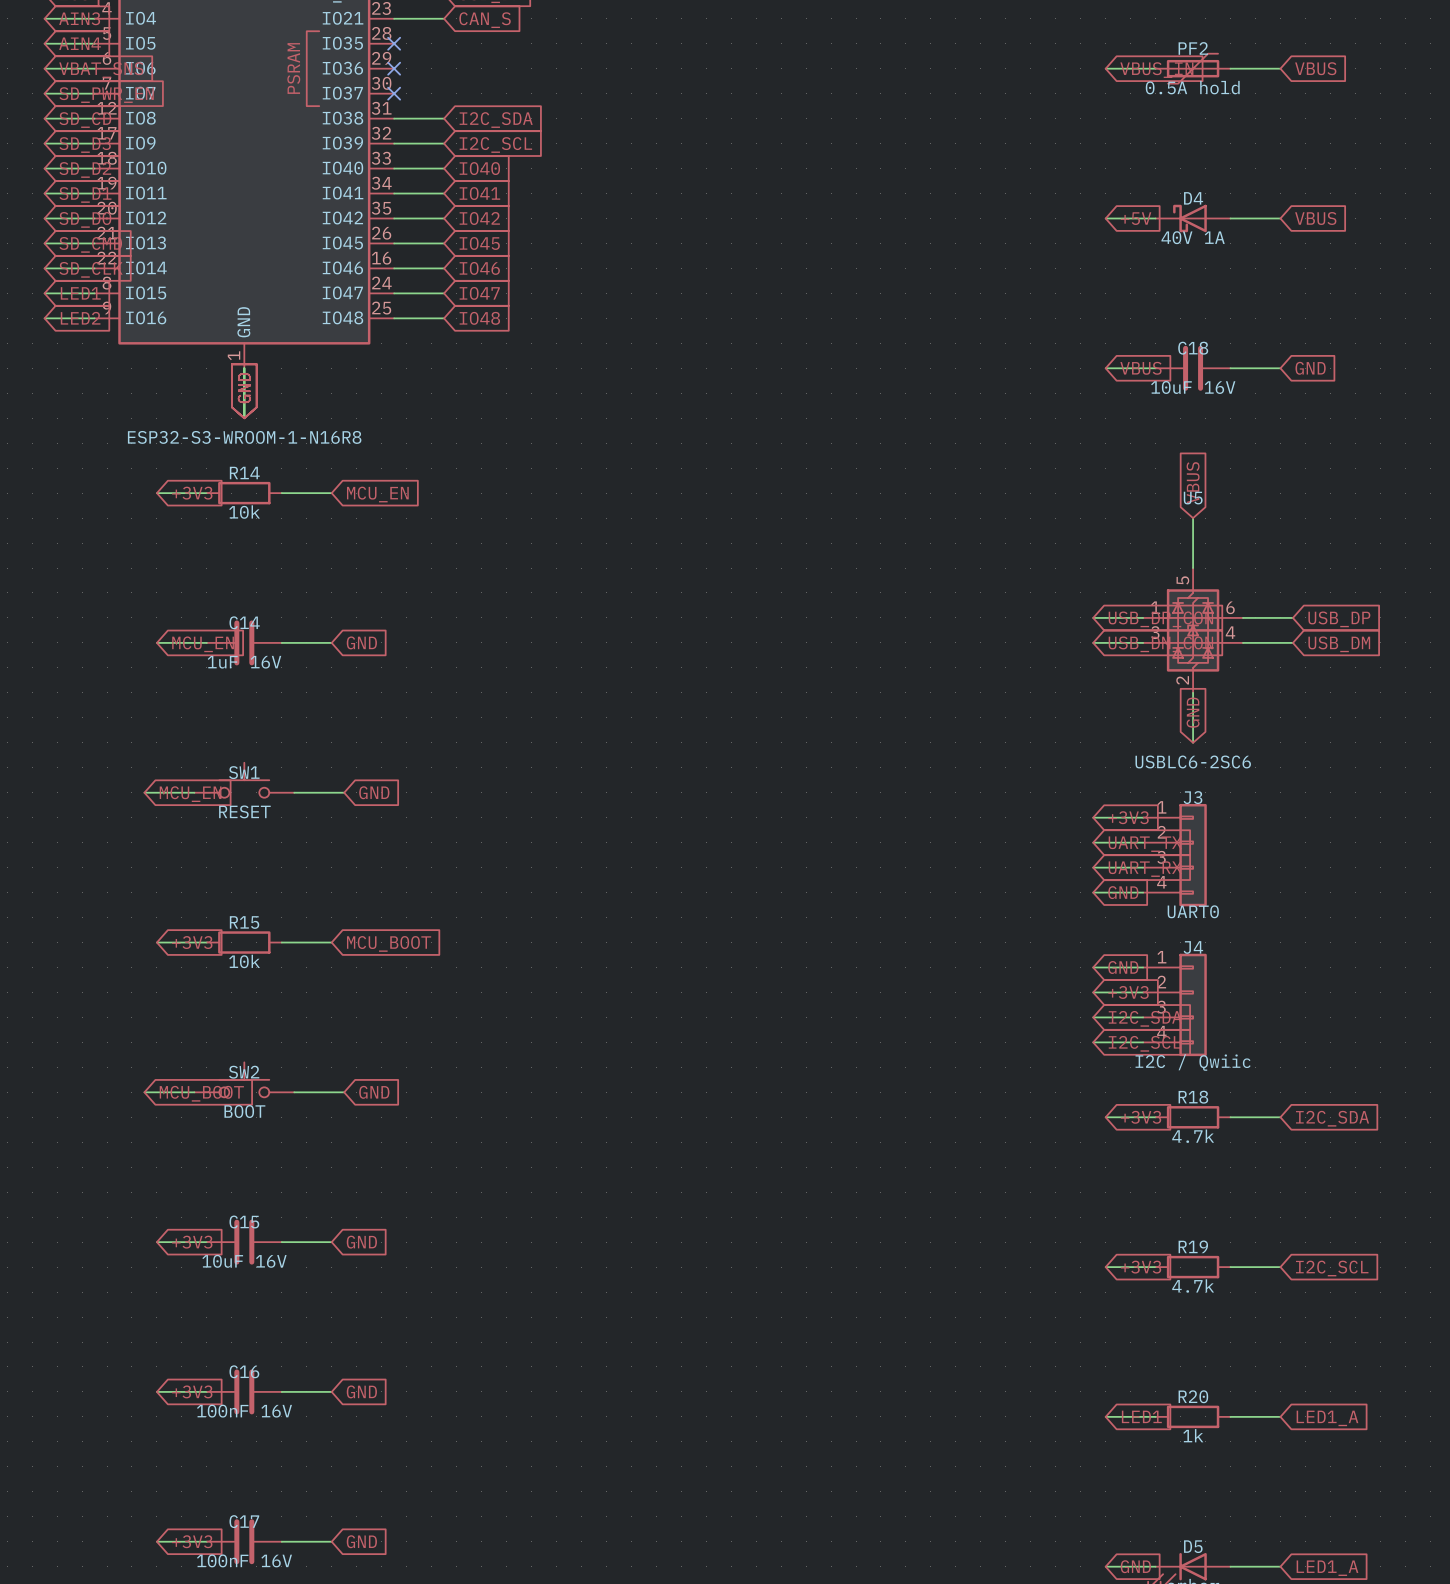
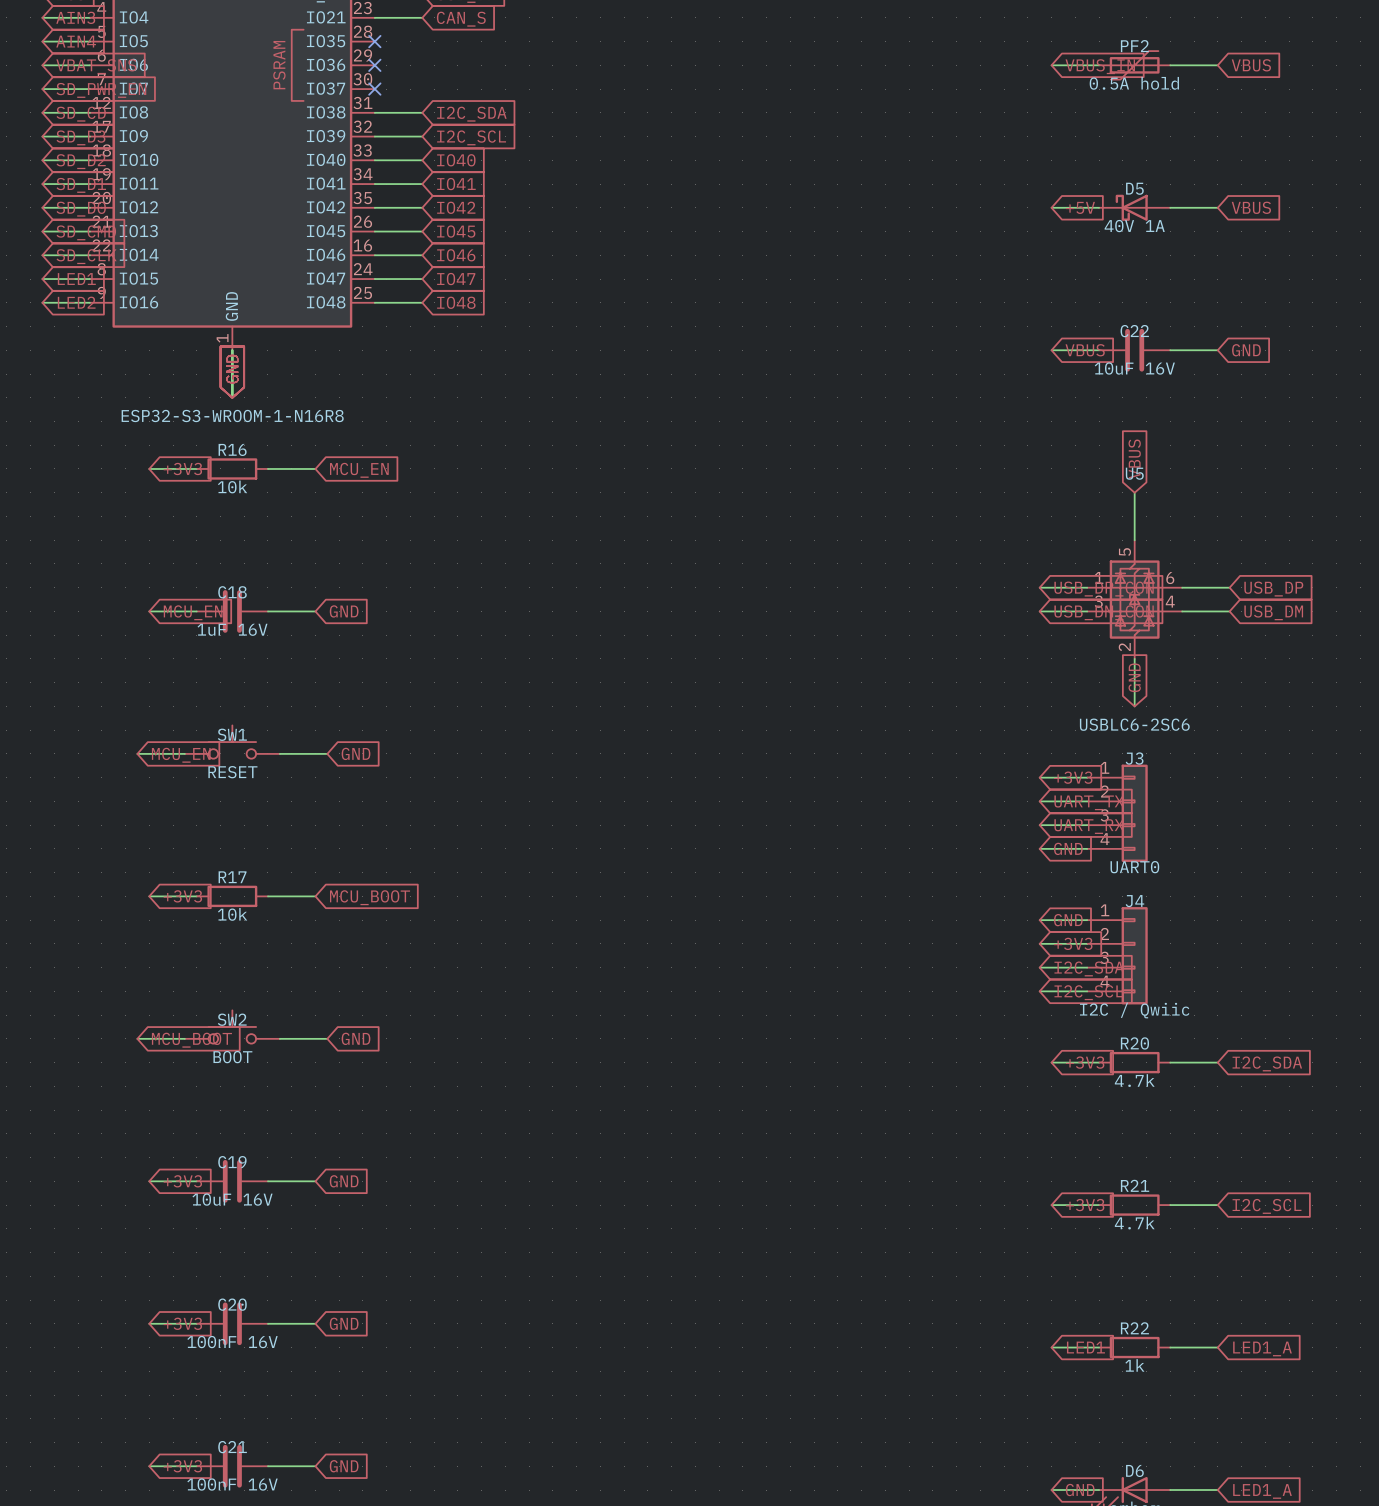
D4 name: D4 (1193, 198) -> D5 (1134, 188)
C18 name: C18 (1193, 348) -> C22 (1134, 331)
R14 name: R14 (244, 473) -> R16 (232, 449)
C14 name: C14 (244, 622) -> C18 (232, 592)
R15 name: R15 (244, 922) -> R17 (232, 877)
R18 name: R18 (1193, 1097) -> R20 (1134, 1043)
C15 name: C15 (244, 1222) -> C19 (232, 1162)
R19 name: R19 (1193, 1246) -> R21 (1135, 1185)
C16 name: C16 (244, 1371) -> C20 (232, 1304)
R20 name: R20 (1193, 1396) -> R22 (1134, 1328)
C17 name: C17 (244, 1521) -> C21 (232, 1447)
D5 name: D5 (1193, 1546) -> D6 (1134, 1470)

